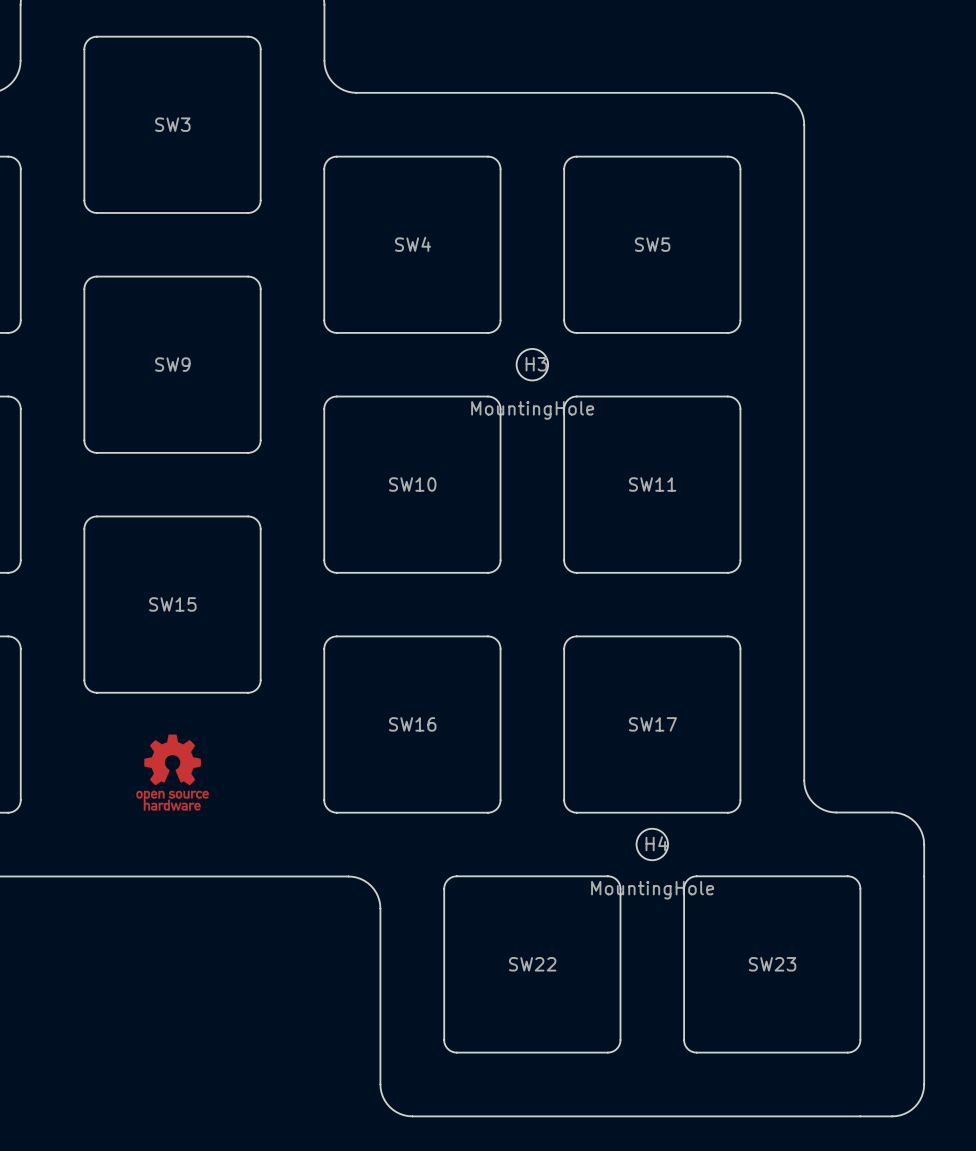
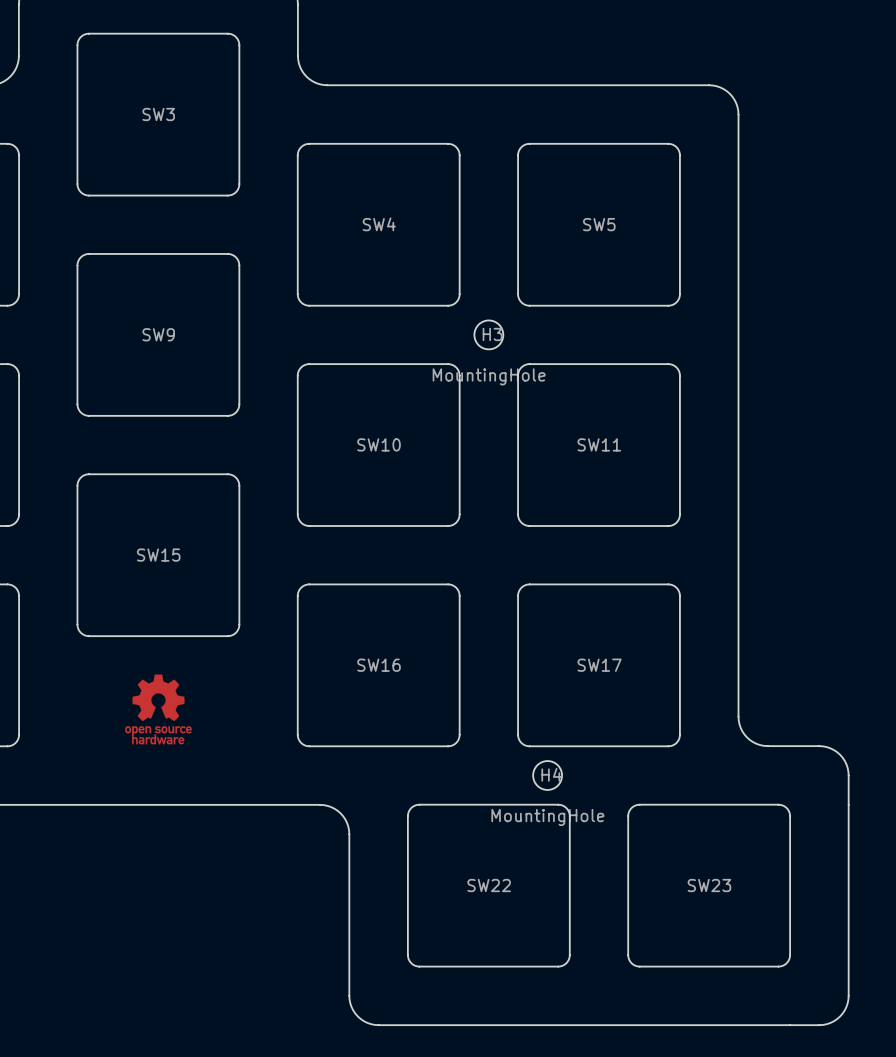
H4 position: (652, 844) -> (547, 775)

